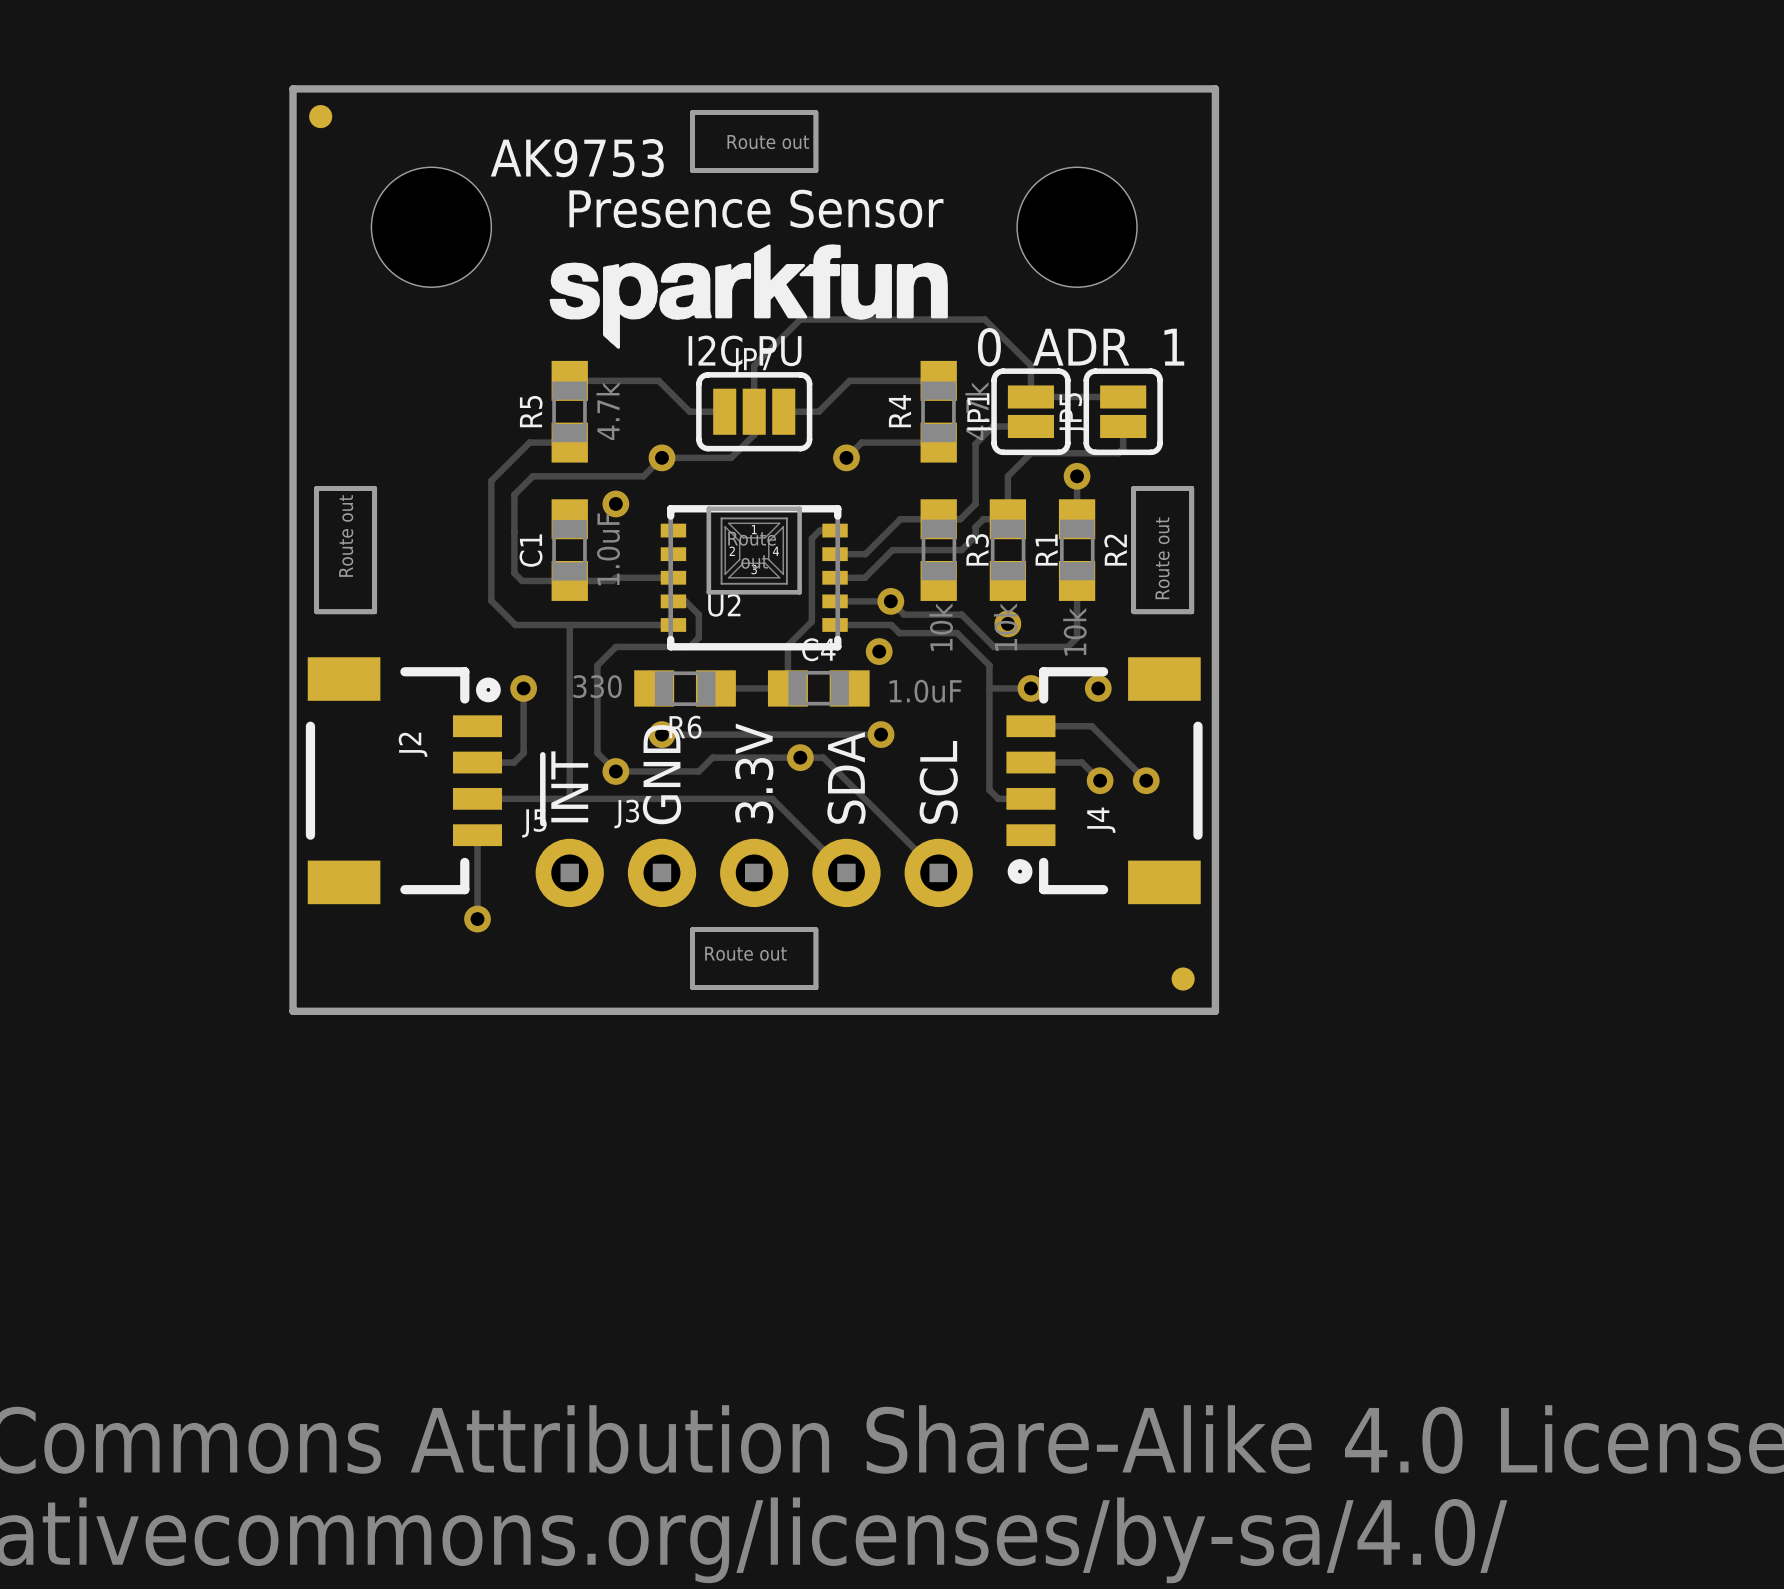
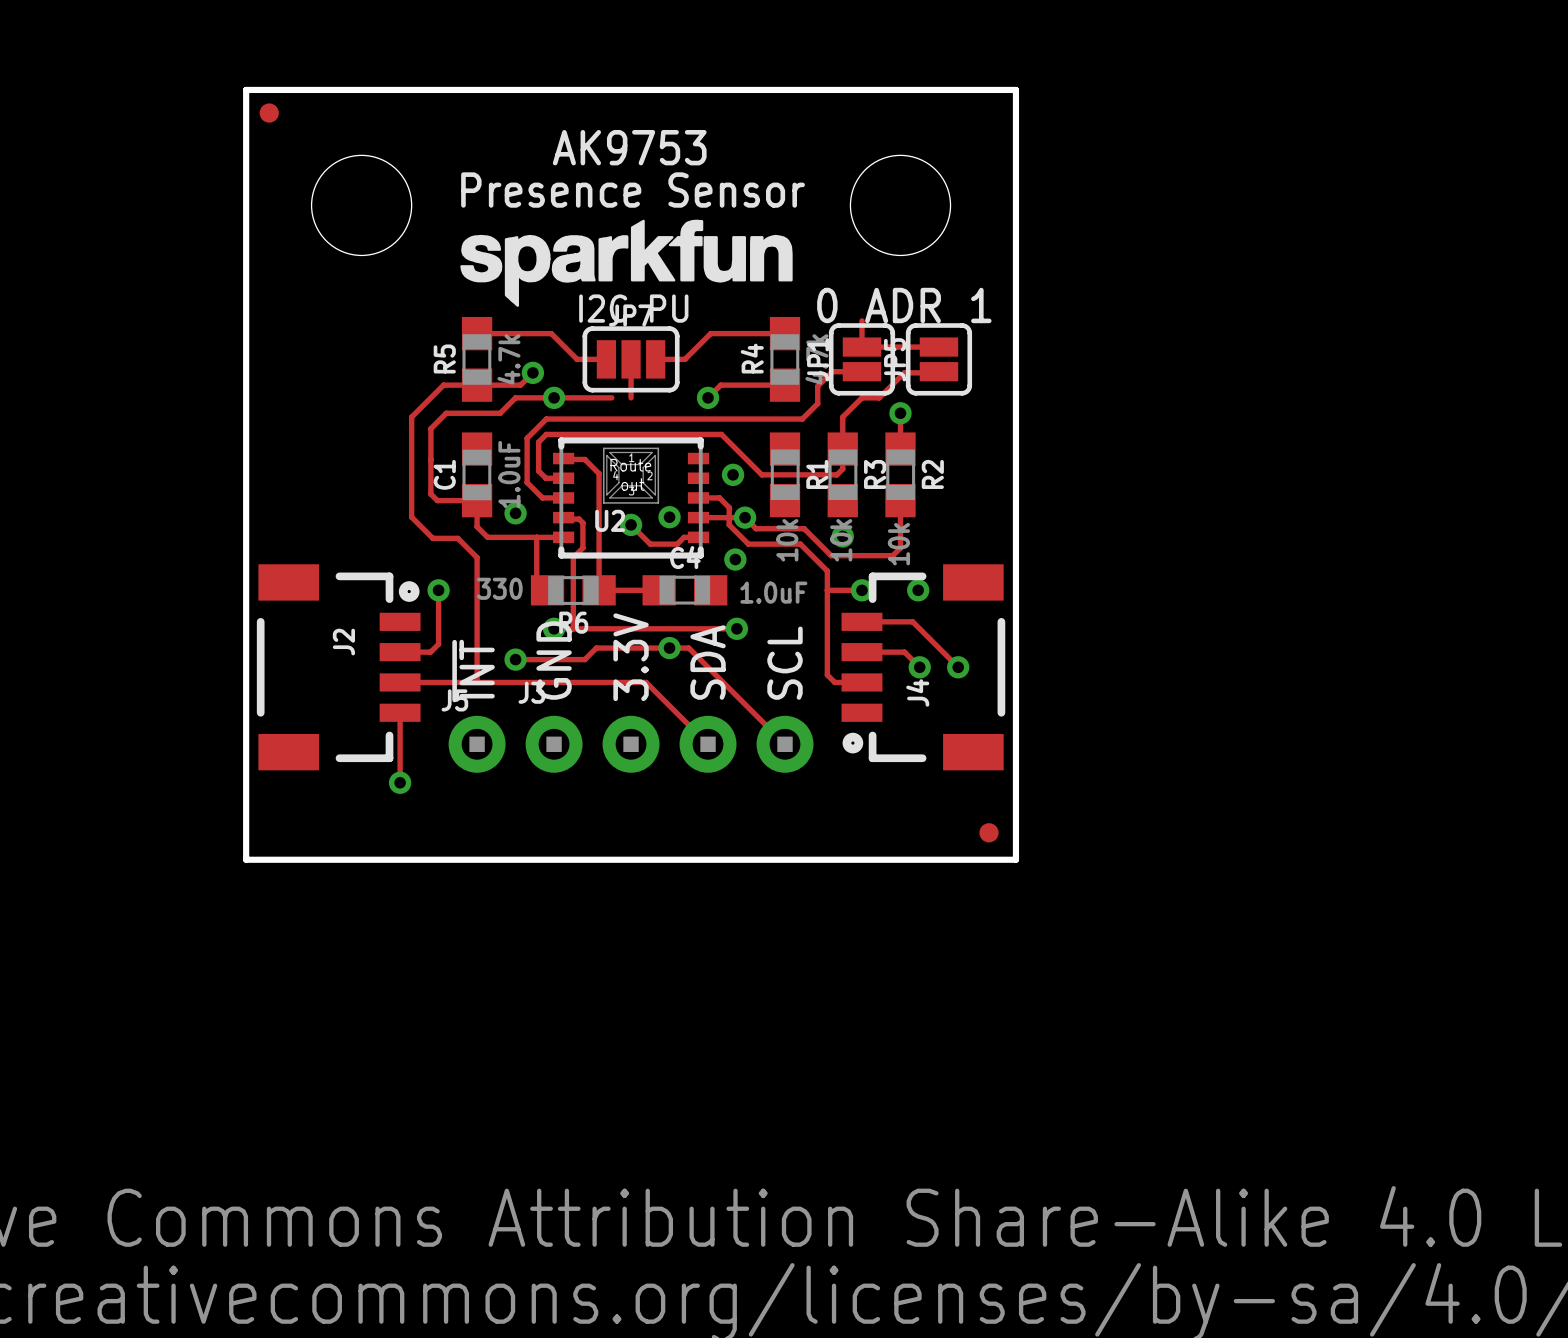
drawing: [314, 110, 1195, 991] -> none
text: Route out (768, 142) -> none
text position: AK9753 (577, 158) -> AK9753 (629, 147)
track: (1030, 365) (984, 319) (800, 319) (754, 365) (754, 411) -> none
track: (995, 426) (993, 426) (975, 444) (975, 503) (960, 519) (900, 519) (865, 554) (835, 554) -> (832, 371) (817, 386) (817, 403) (802, 419) (546, 419) (527, 438) (527, 482) (542, 497)
track: (1123, 426) (1123, 448) (1118, 453) (1030, 453) (1007, 476) (1007, 480) -> (938, 371) (904, 372) (879, 397) (861, 397) (842, 417)
track: none -> (532, 372) (520, 385) (477, 385)
via: none -> (532, 372)
track: (754, 434) (731, 457) -> (631, 378) (631, 397)
track: (661, 457) (643, 476) (597, 476) -> (554, 397) (515, 397) (500, 413)
via: (615, 503) -> none
U2 footprint: [660, 505, 848, 651] -> [553, 437, 710, 559]
track: (1007, 519) (983, 519) (975, 527) (975, 536) (961, 550) -> (842, 449) (842, 469) (836, 474) (804, 474)
track: none -> (563, 458) (584, 459) (599, 473) (599, 590)
track: (835, 530) (819, 530) (811, 538) (811, 621) (787, 645) (787, 688) -> none
text: Route out (346, 536) -> none
R3 name: R3 (977, 549) -> R1 (817, 474)
via: none -> (733, 474)
track: (911, 550) (892, 550) (864, 577) (860, 577) -> (761, 474) (721, 434) (546, 434) (538, 442) (538, 471) (545, 478) (563, 478)
R1 name: R1 (1046, 550) -> R3 (875, 474)
text: Route out (1162, 558) -> none
track: (648, 577) (615, 577) (612, 580) (569, 580) -> (487, 537) (477, 526) (477, 500)
via: none -> (515, 513)
via: none -> (669, 517)
track: (673, 601) (685, 601) (698, 614) (698, 637) (689, 646) (615, 646) (597, 665) (597, 753) (615, 771) -> (563, 517) (579, 519) (582, 522) (582, 547) (573, 557) (573, 628)
track: none -> (631, 524) (650, 544) (677, 544) (684, 537) (698, 537)
via: none -> (631, 524)
track: (515, 624) (582, 624) -> (431, 537) (457, 538) (477, 557)
track: (569, 624) (569, 649) -> none
track: none -> (536, 537) (536, 590) (547, 590) (536, 579)
track: (835, 624) (891, 624) (899, 633) -> (719, 497) (729, 507) (729, 524) (748, 544) (752, 544)
text: Route out (746, 953) -> none

